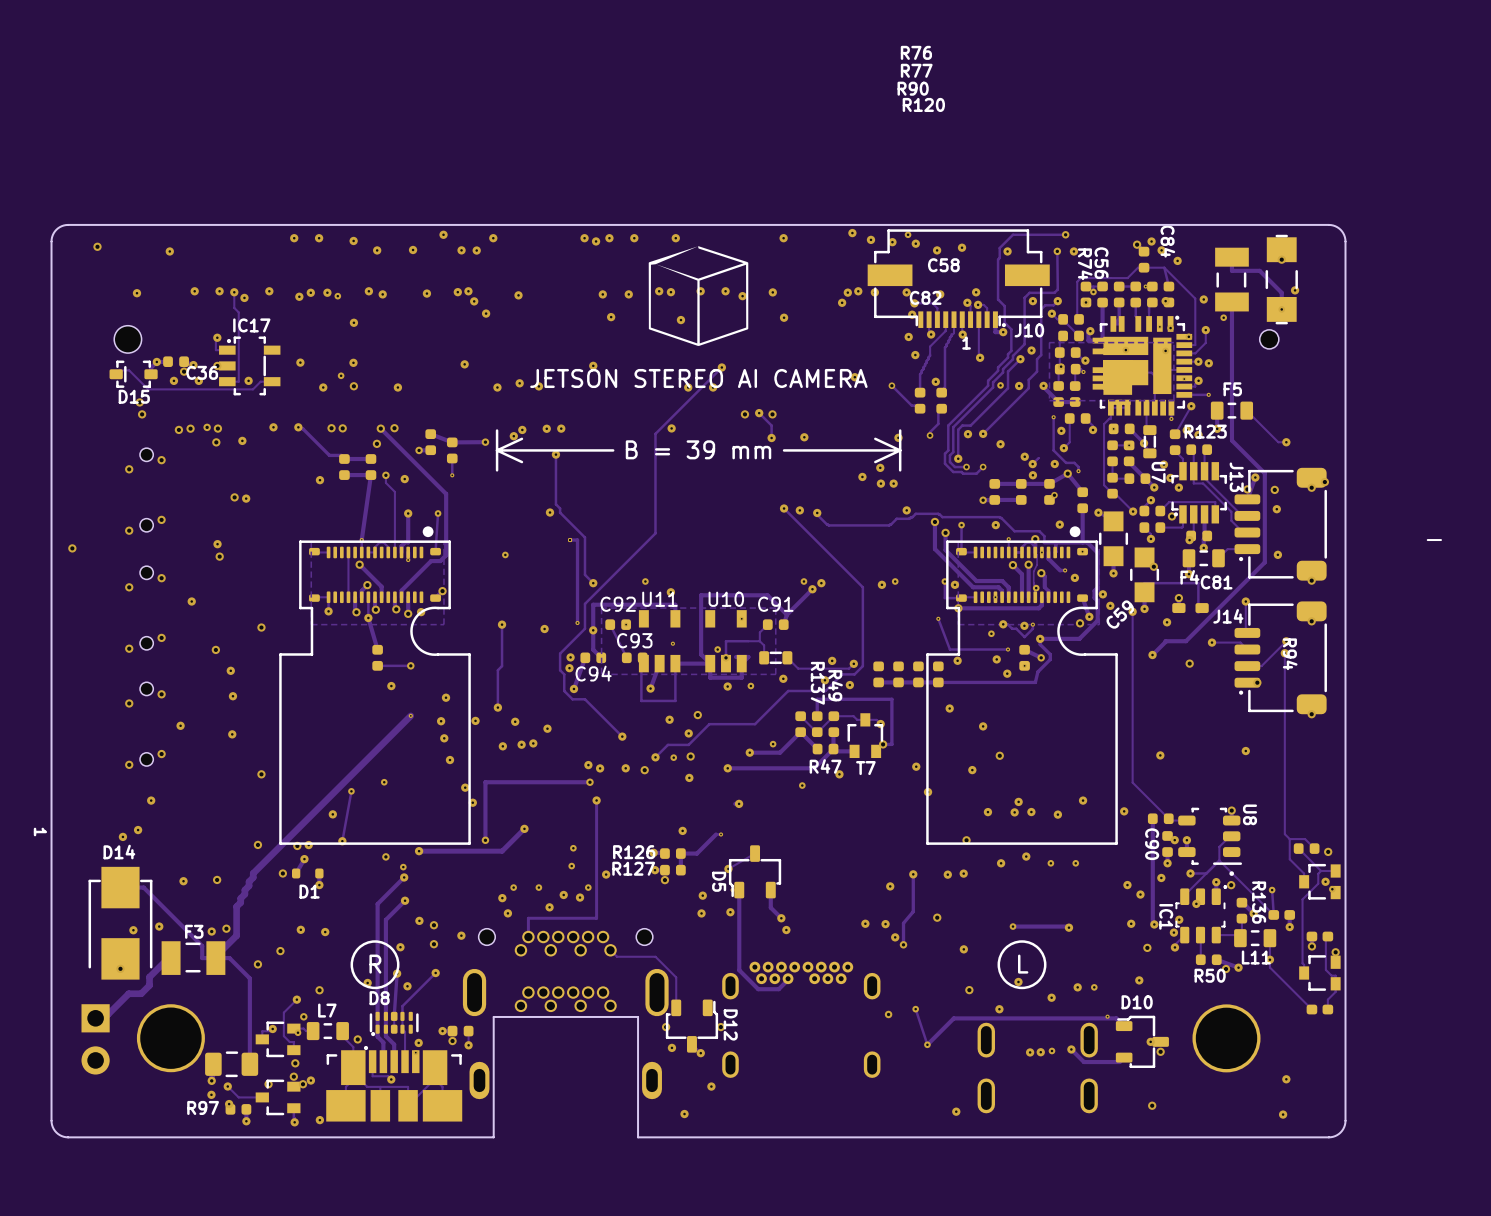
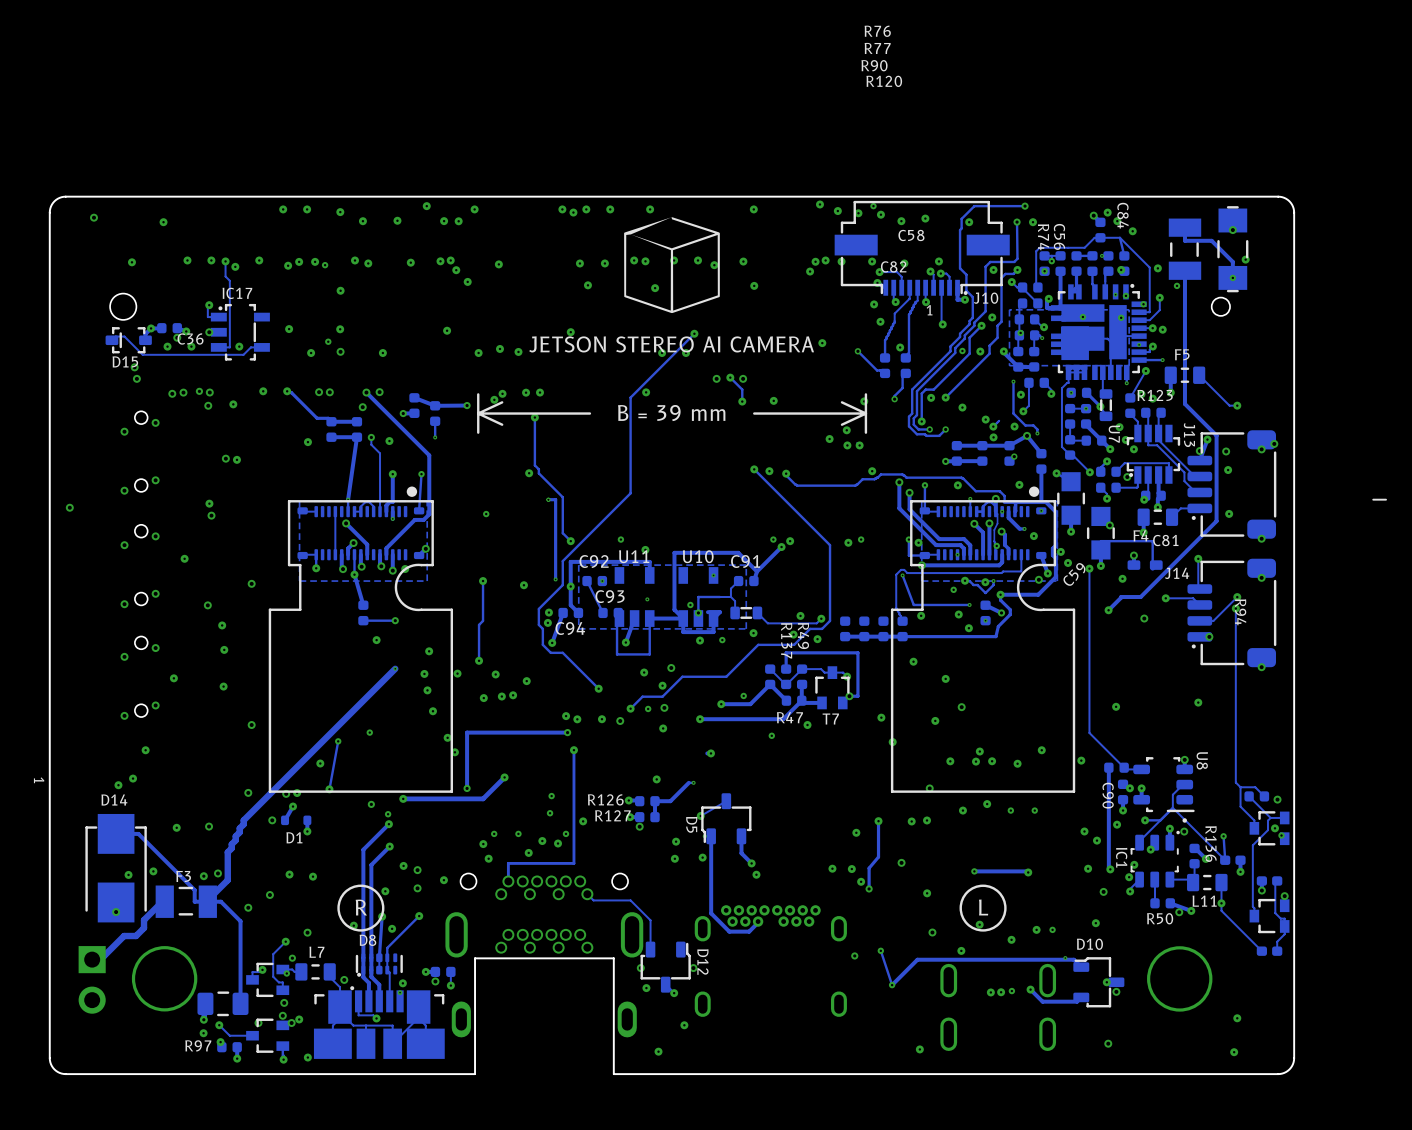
track: none -> (1021, 554) (1021, 571)
track: none -> (1020, 571) (907, 573) (901, 569) (896, 574) (896, 608) (902, 620)

